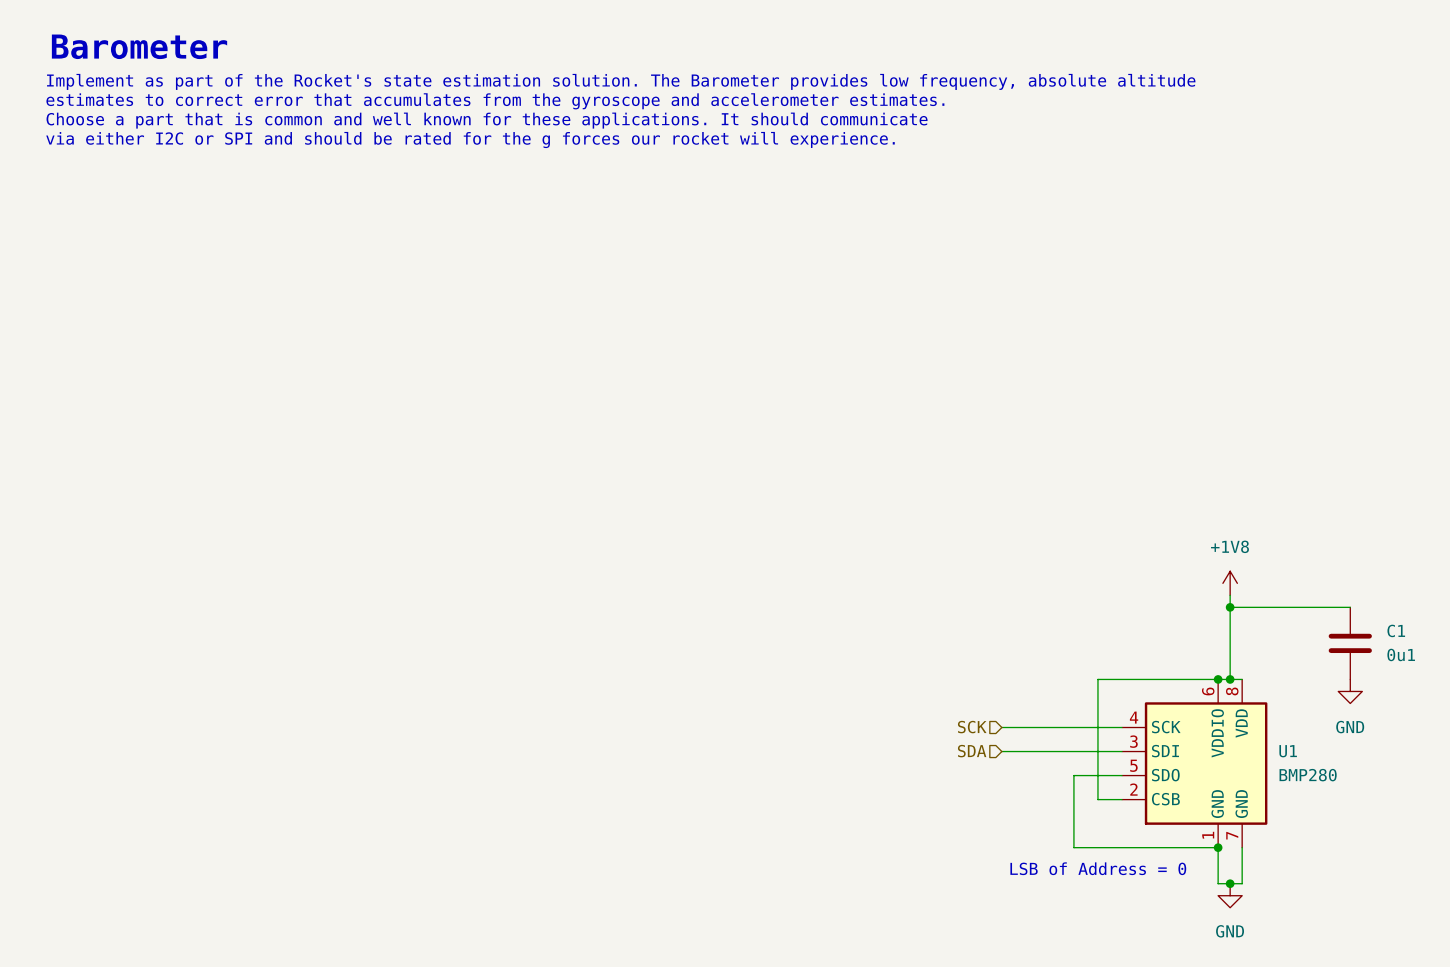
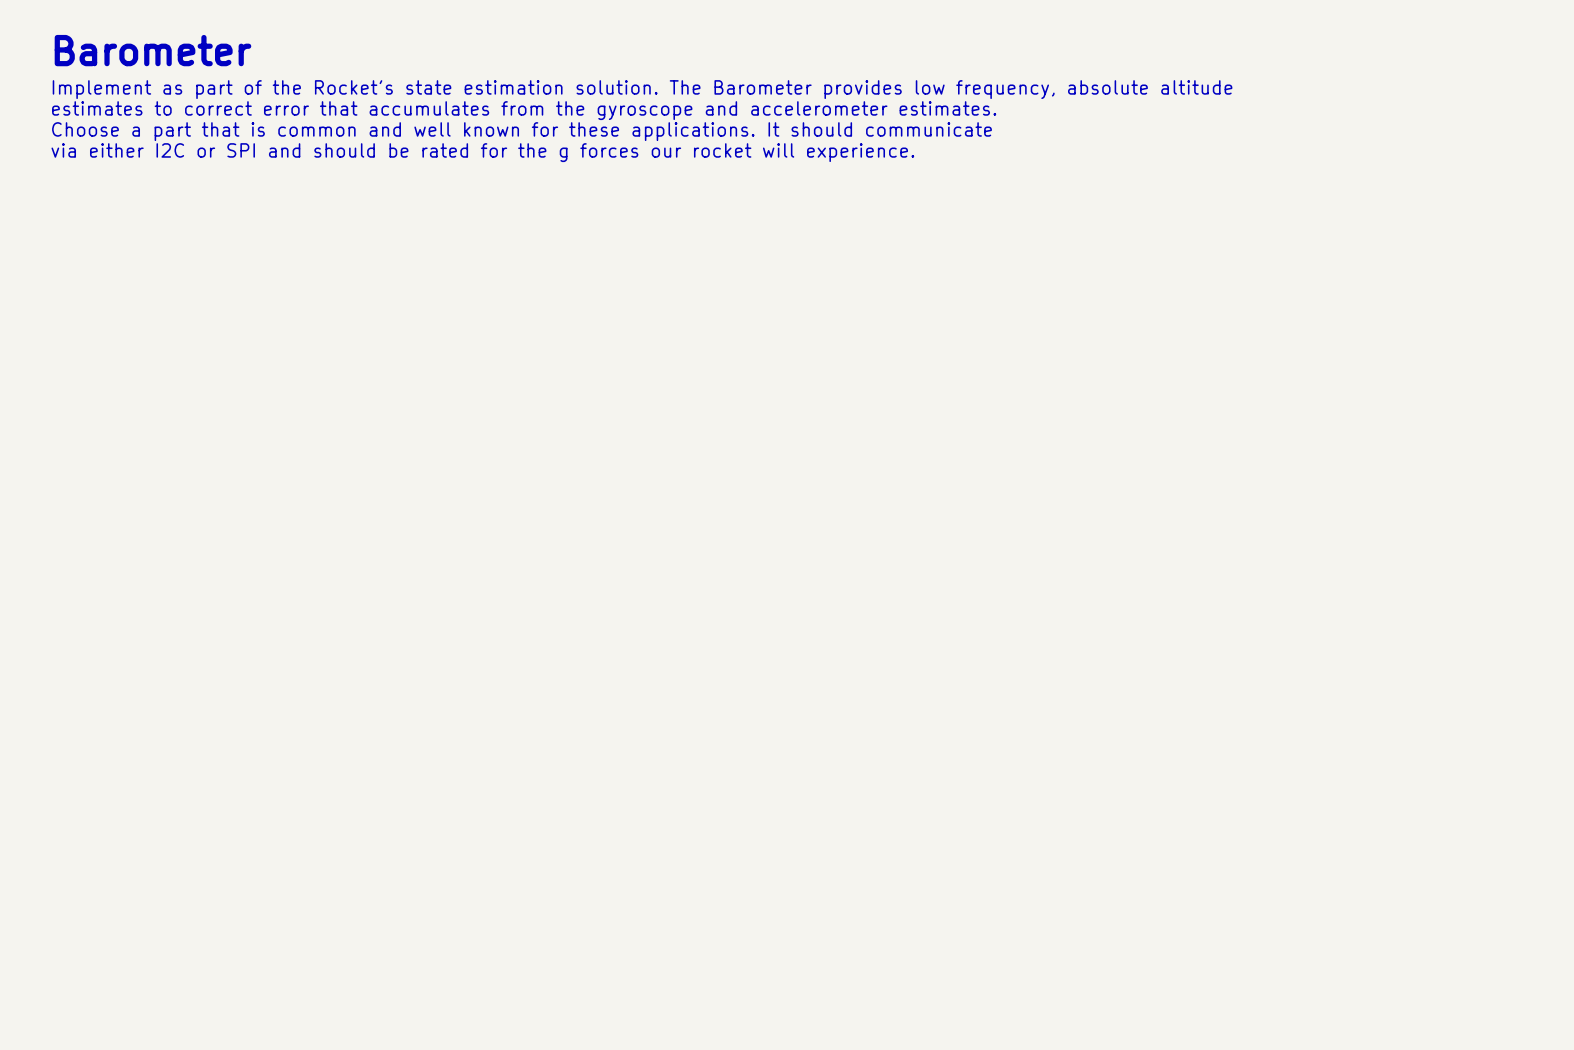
power symbol: +1V8 (1230, 583) -> none
wire: (1230, 595) (1230, 679) -> none
wire: (1230, 607) (1350, 607) -> none
junction: (1230, 607) -> none
C1: 0u1 (1350, 643) -> none
junction: (1218, 679) -> none
junction: (1230, 679) -> none
wire: (1242, 679) (1097, 679) (1097, 799) (1122, 799) -> none
power symbol: GND (1350, 691) -> none
hierarchical label: SCK (972, 727) -> none
wire: (1001, 727) (1122, 727) -> none
hierarchical label: SDA (972, 751) -> none
wire: (1001, 751) (1122, 751) -> none
U1: BMP280 (1194, 763) -> none
wire: (1122, 775) (1073, 775) (1073, 847) (1218, 847) (1218, 883) (1242, 883) (1242, 847) -> none
junction: (1218, 847) -> none
text: LSB of Address = 0 (1098, 868) -> none
junction: (1230, 883) -> none
power symbol: GND (1230, 895) -> none

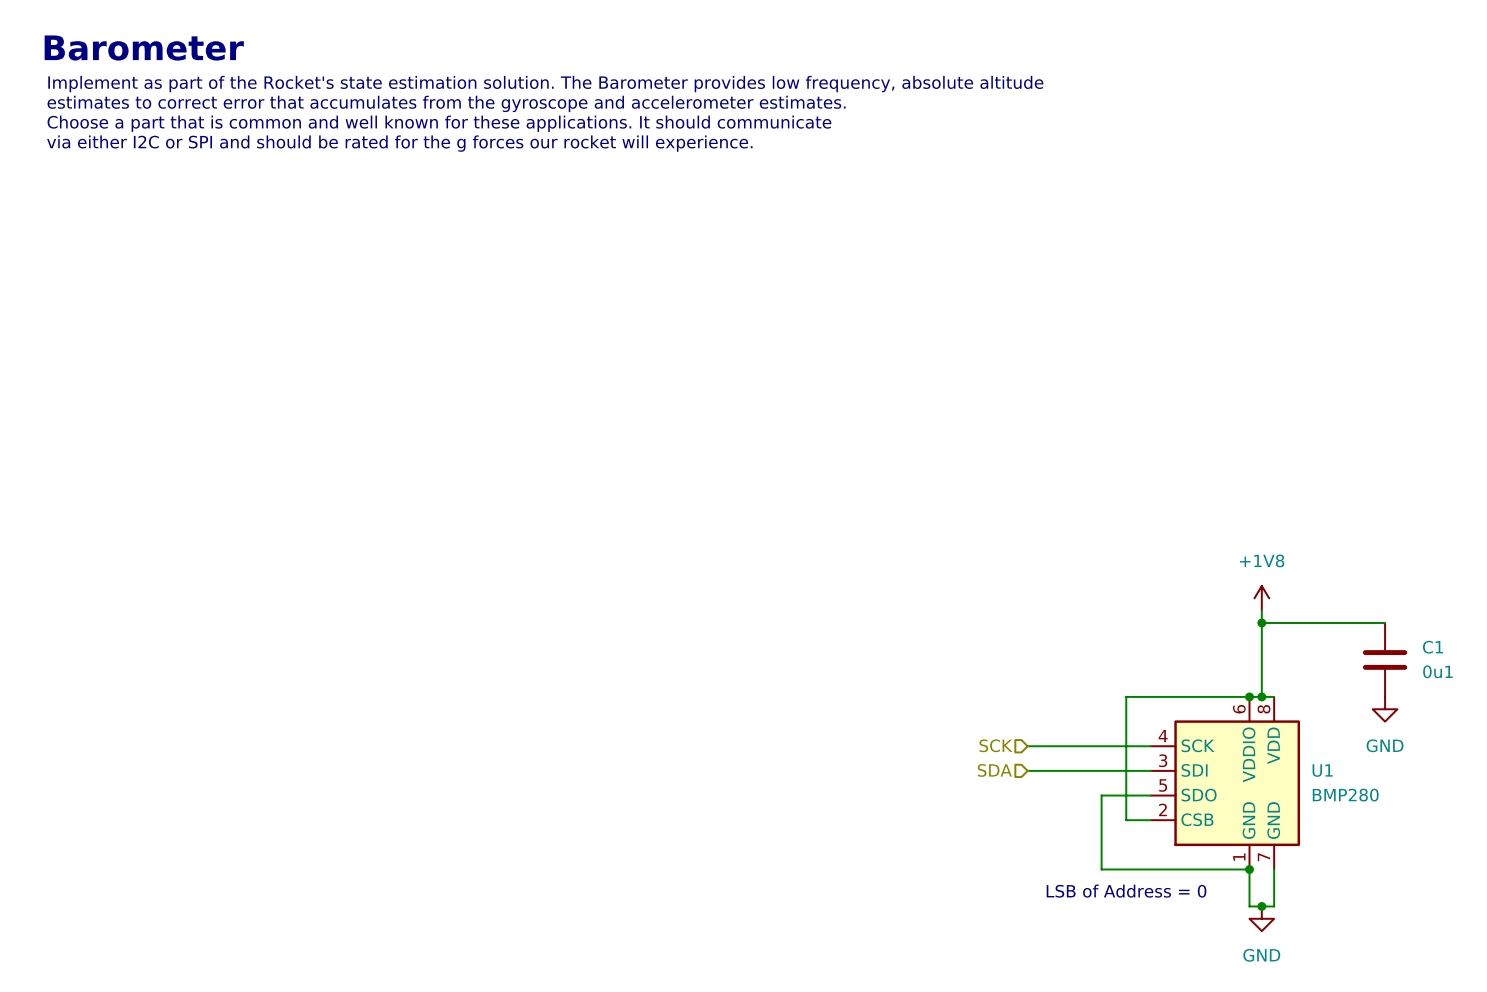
power symbol: none -> +1V8 (1261, 598)
wire: none -> (1261, 610) (1261, 696)
wire: none -> (1261, 622) (1385, 622)
junction: none -> (1261, 622)
C1: none -> 0u1 (1385, 659)
junction: none -> (1249, 696)
junction: none -> (1261, 696)
wire: none -> (1274, 696) (1126, 696) (1126, 820) (1150, 820)
power symbol: none -> GND (1385, 709)
hierarchical label: none -> SCK (995, 745)
wire: none -> (1027, 746) (1150, 746)
hierarchical label: none -> SDA (994, 770)
wire: none -> (1027, 770) (1150, 770)
U1: none -> BMP280 (1225, 783)
wire: none -> (1150, 795) (1101, 795) (1101, 869) (1249, 869) (1249, 906) (1274, 906) (1274, 869)
junction: none -> (1249, 869)
text: none -> LSB of Address = 0 (1126, 891)
junction: none -> (1261, 906)
power symbol: none -> GND (1261, 918)

